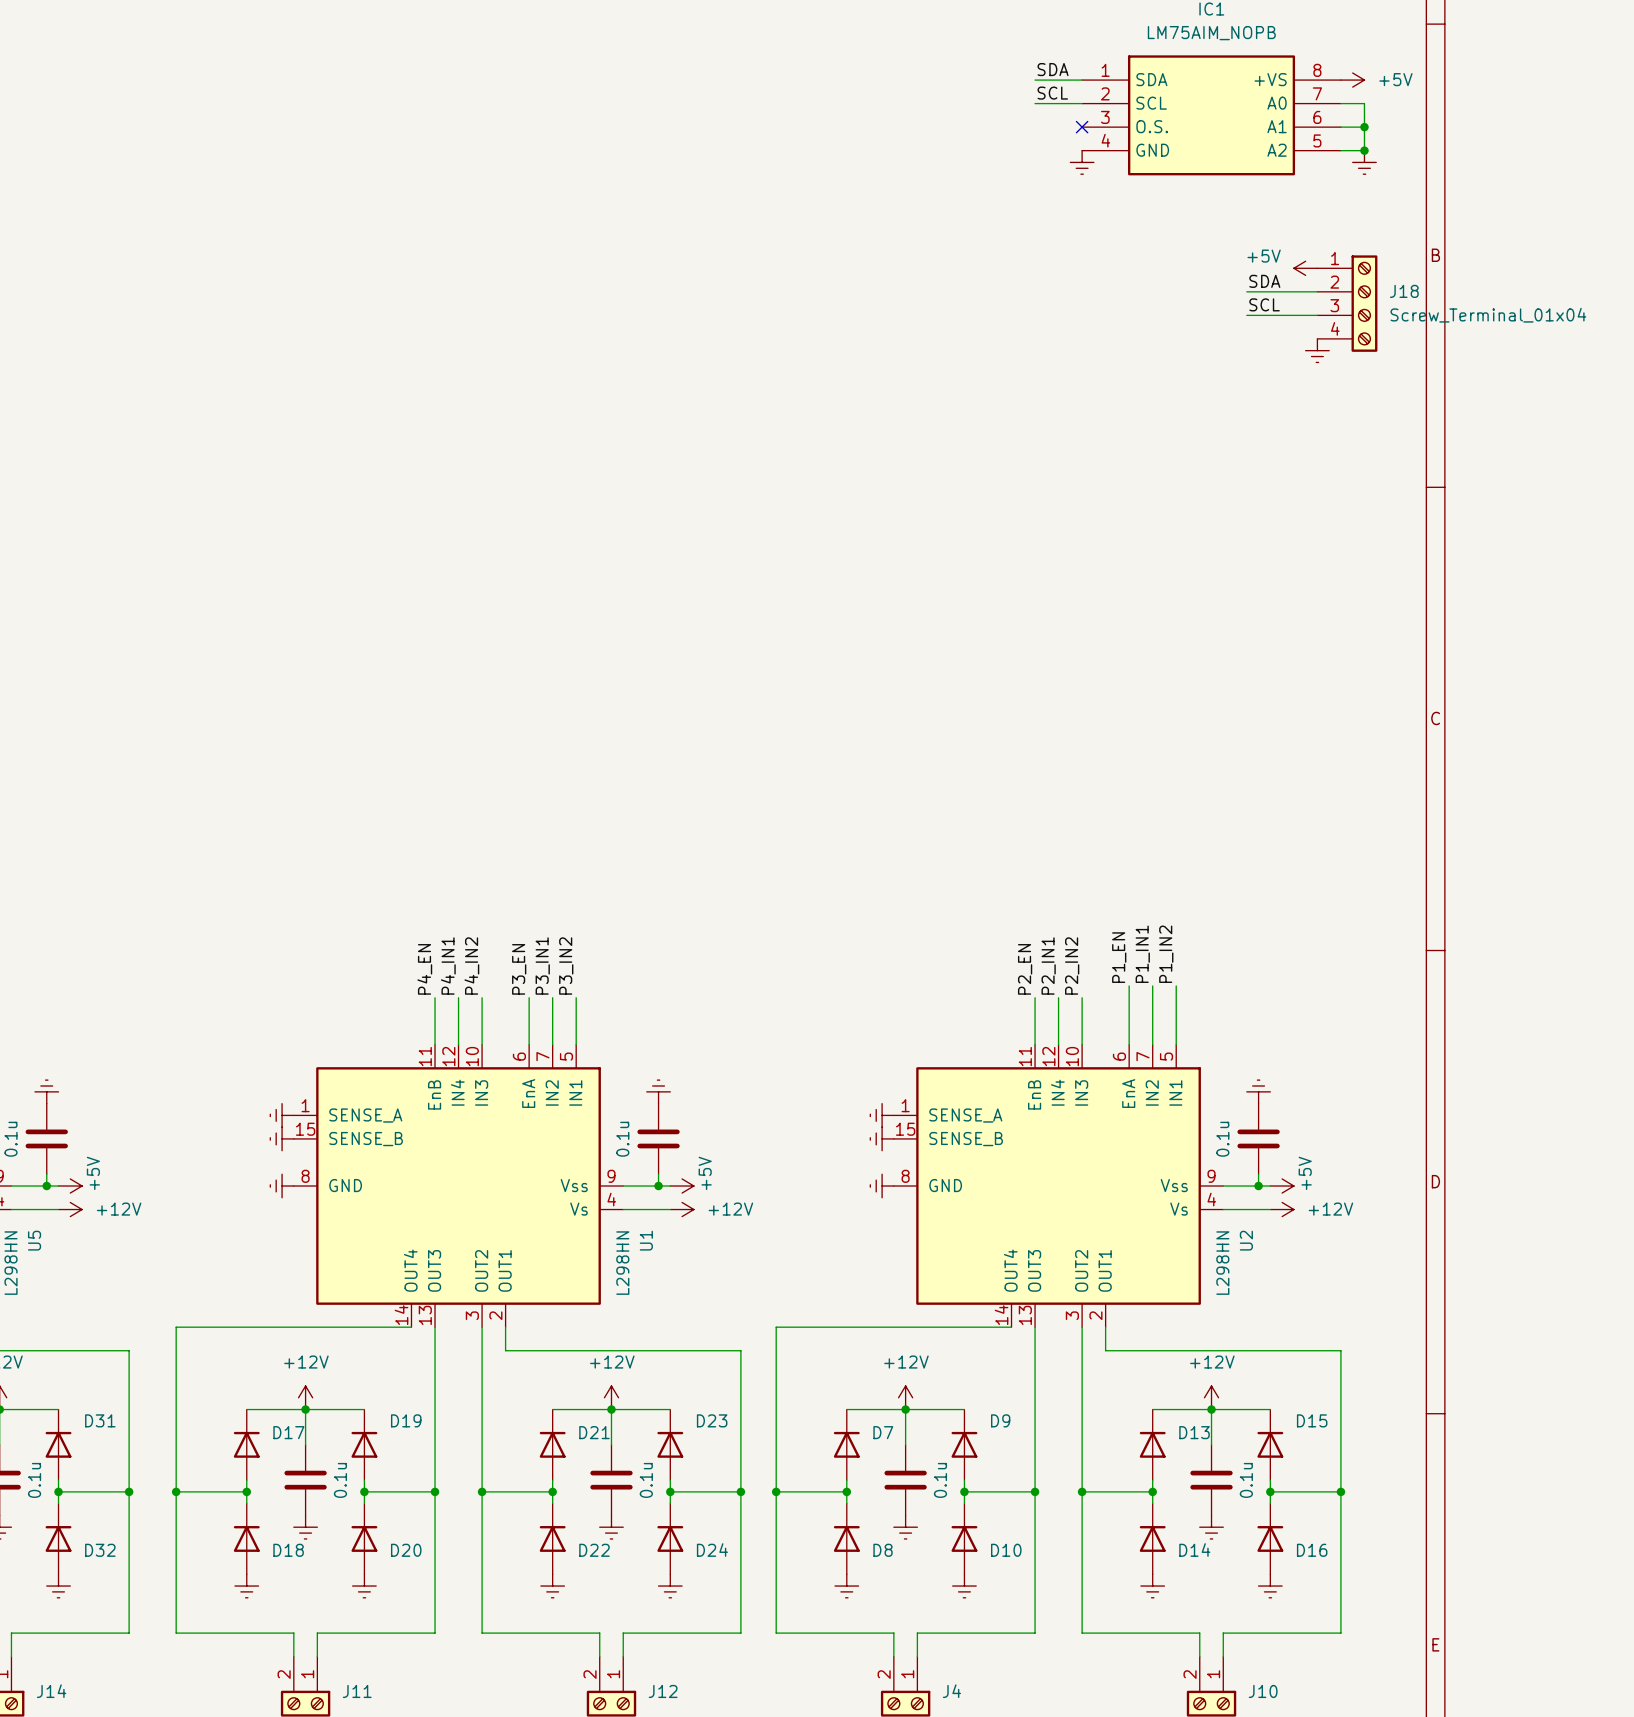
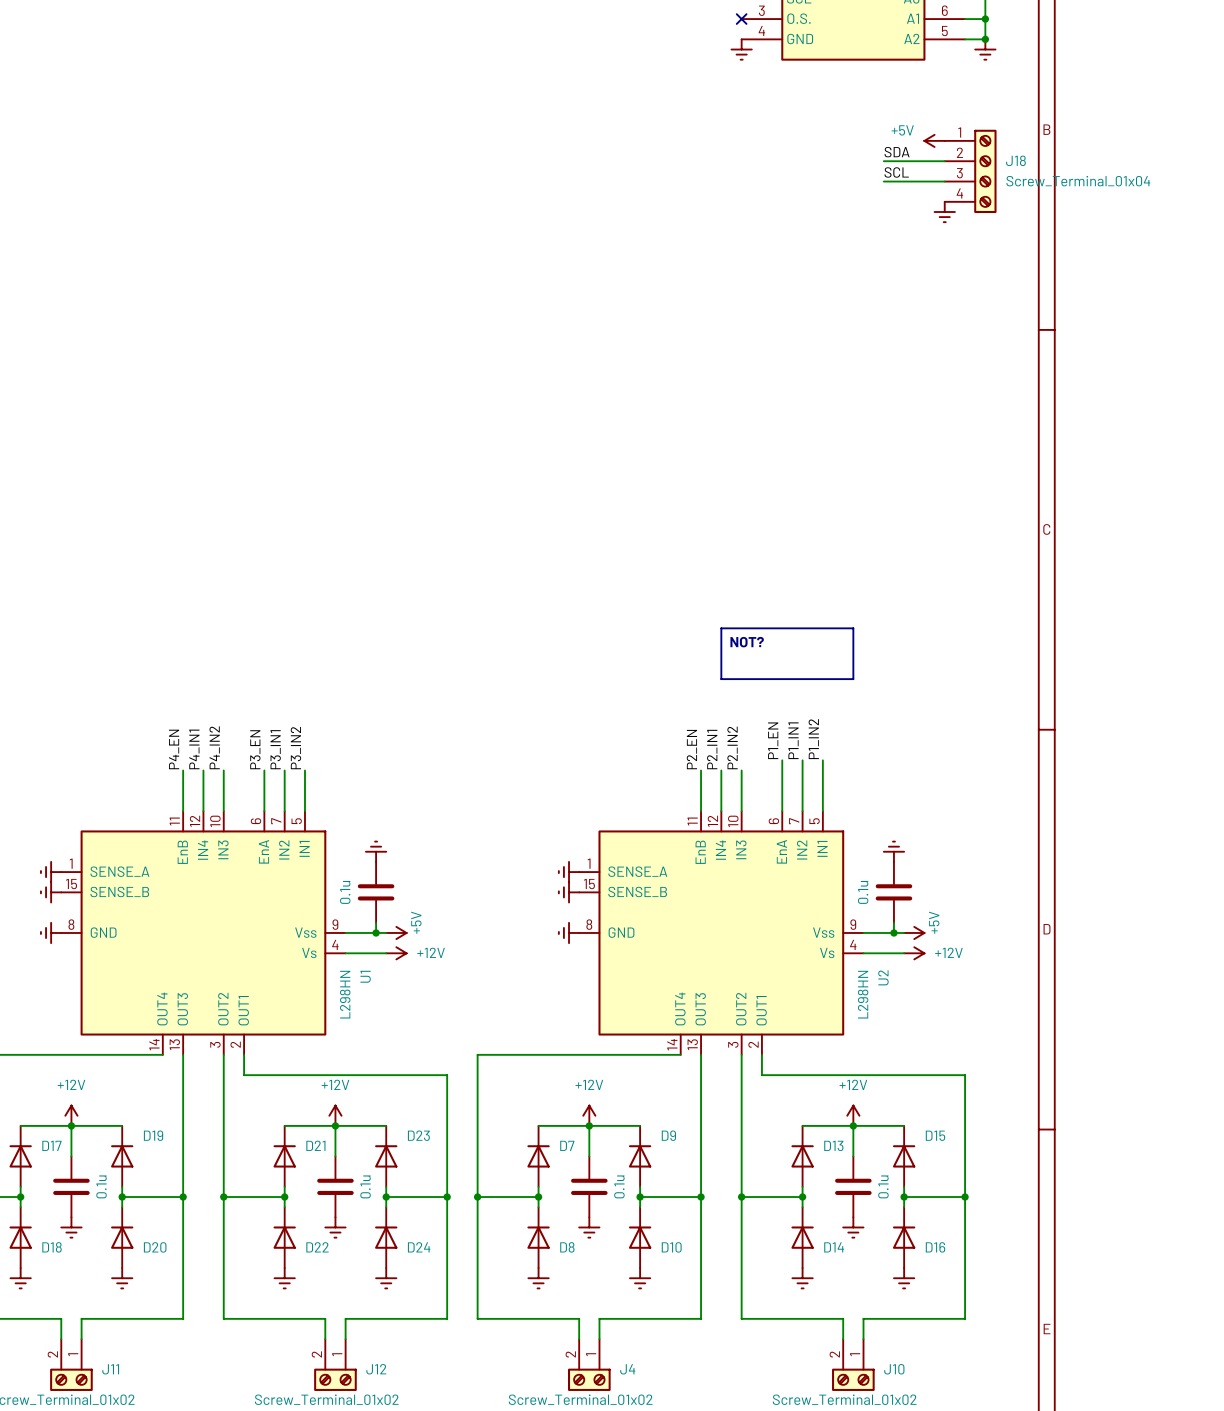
line: none -> (721, 628) (853, 628) (853, 679) (721, 679) (721, 628)
text: none -> NOT? (747, 642)

